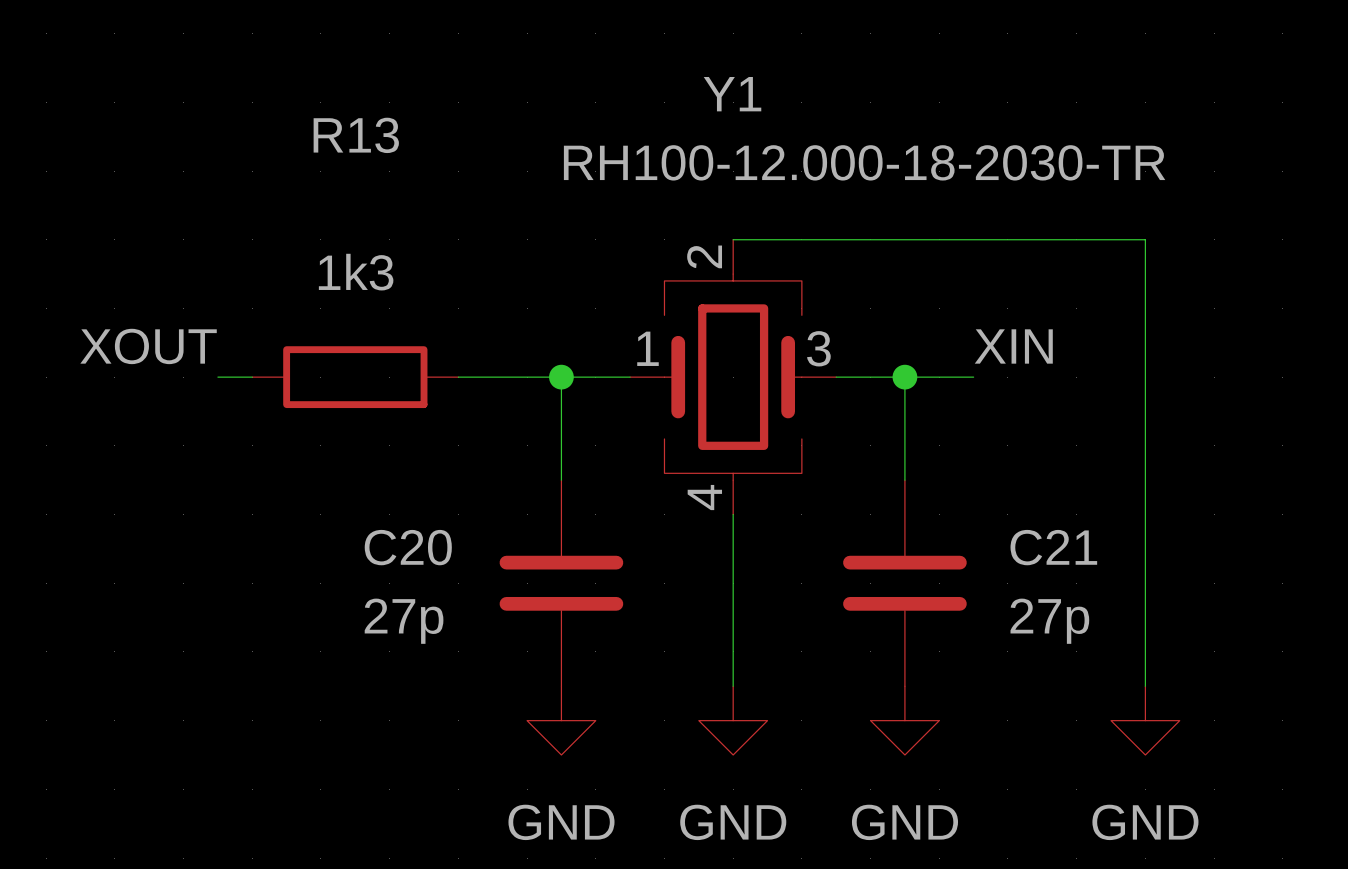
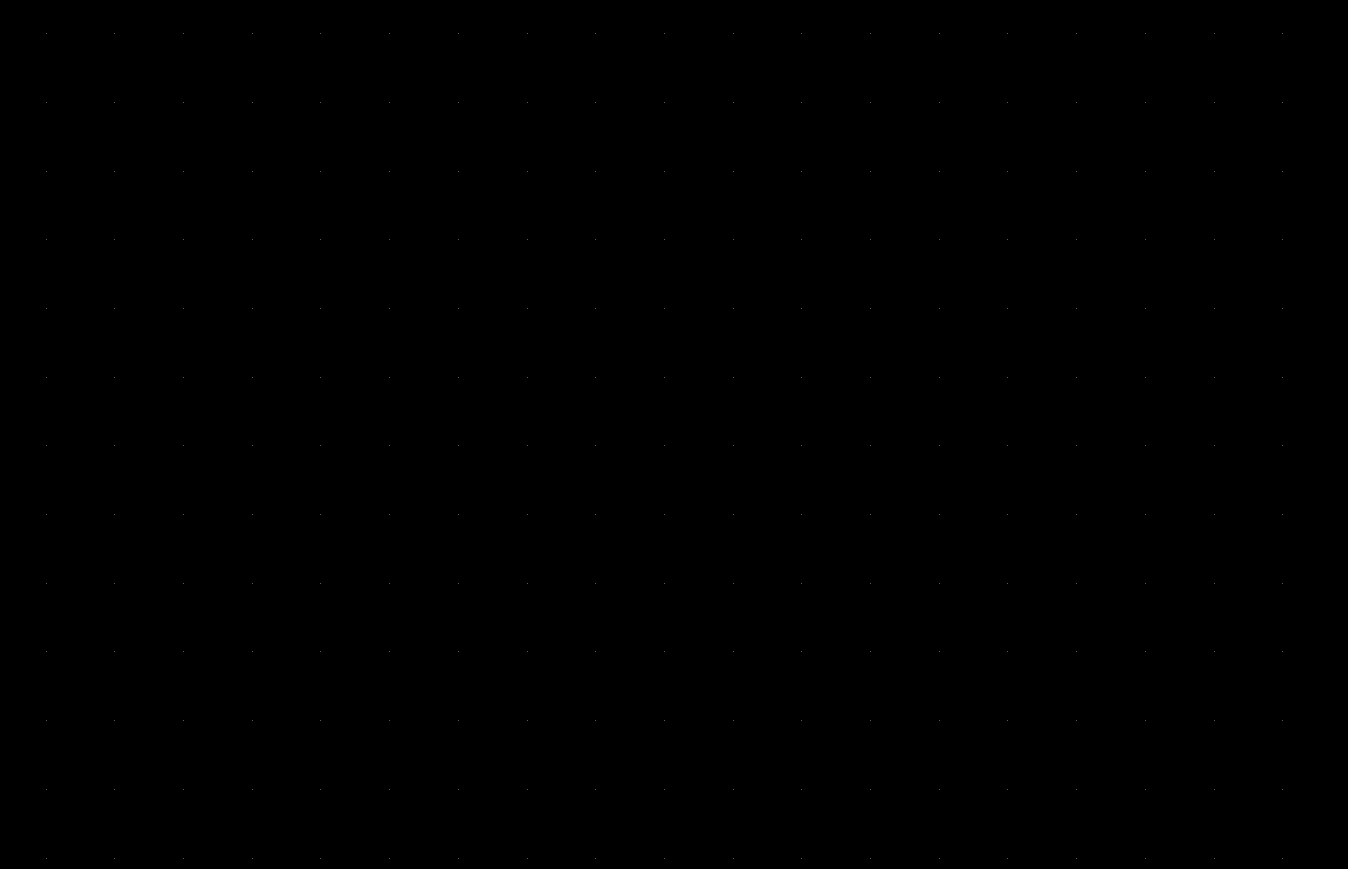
wire: (733, 239) (1145, 239) (1145, 686) -> none
label: XOUT (148, 346) -> none
label: XIN (1013, 346) -> none
wire: (217, 377) (252, 377) -> none
R13: 1k3 (355, 377) -> none
wire: (458, 377) (630, 377) -> none
wire: (561, 377) (561, 480) -> none
junction: (561, 377) -> none
Y1: RH100-12.000-18-2030-TR (733, 377) -> none
wire: (836, 377) (973, 377) -> none
wire: (904, 377) (904, 480) -> none
junction: (904, 377) -> none
wire: (733, 514) (733, 686) -> none
C20: 27p (561, 583) -> none
C21: 27p (904, 583) -> none
power symbol: GND (561, 720) -> none
power symbol: GND (733, 720) -> none
power symbol: GND (904, 720) -> none
power symbol: GND (1145, 720) -> none

